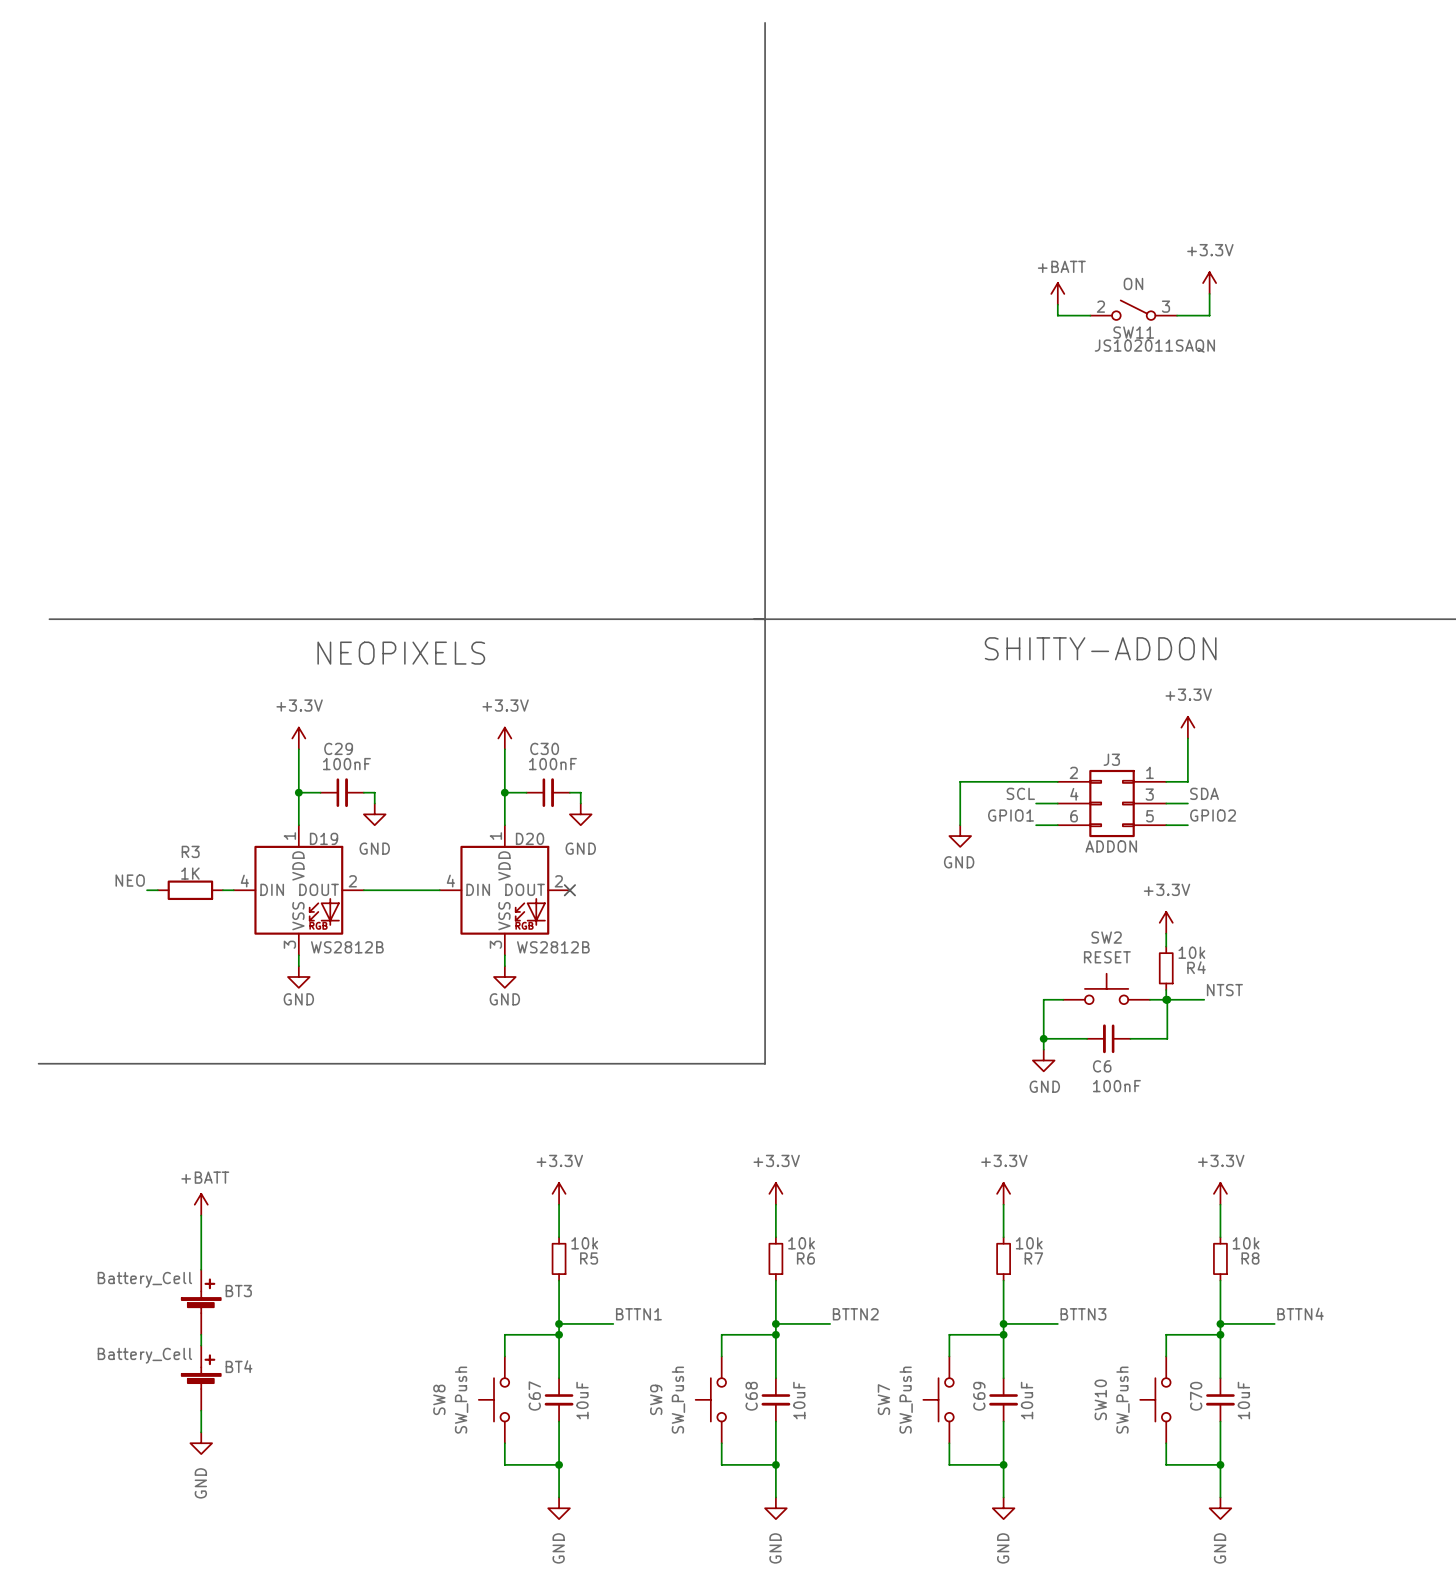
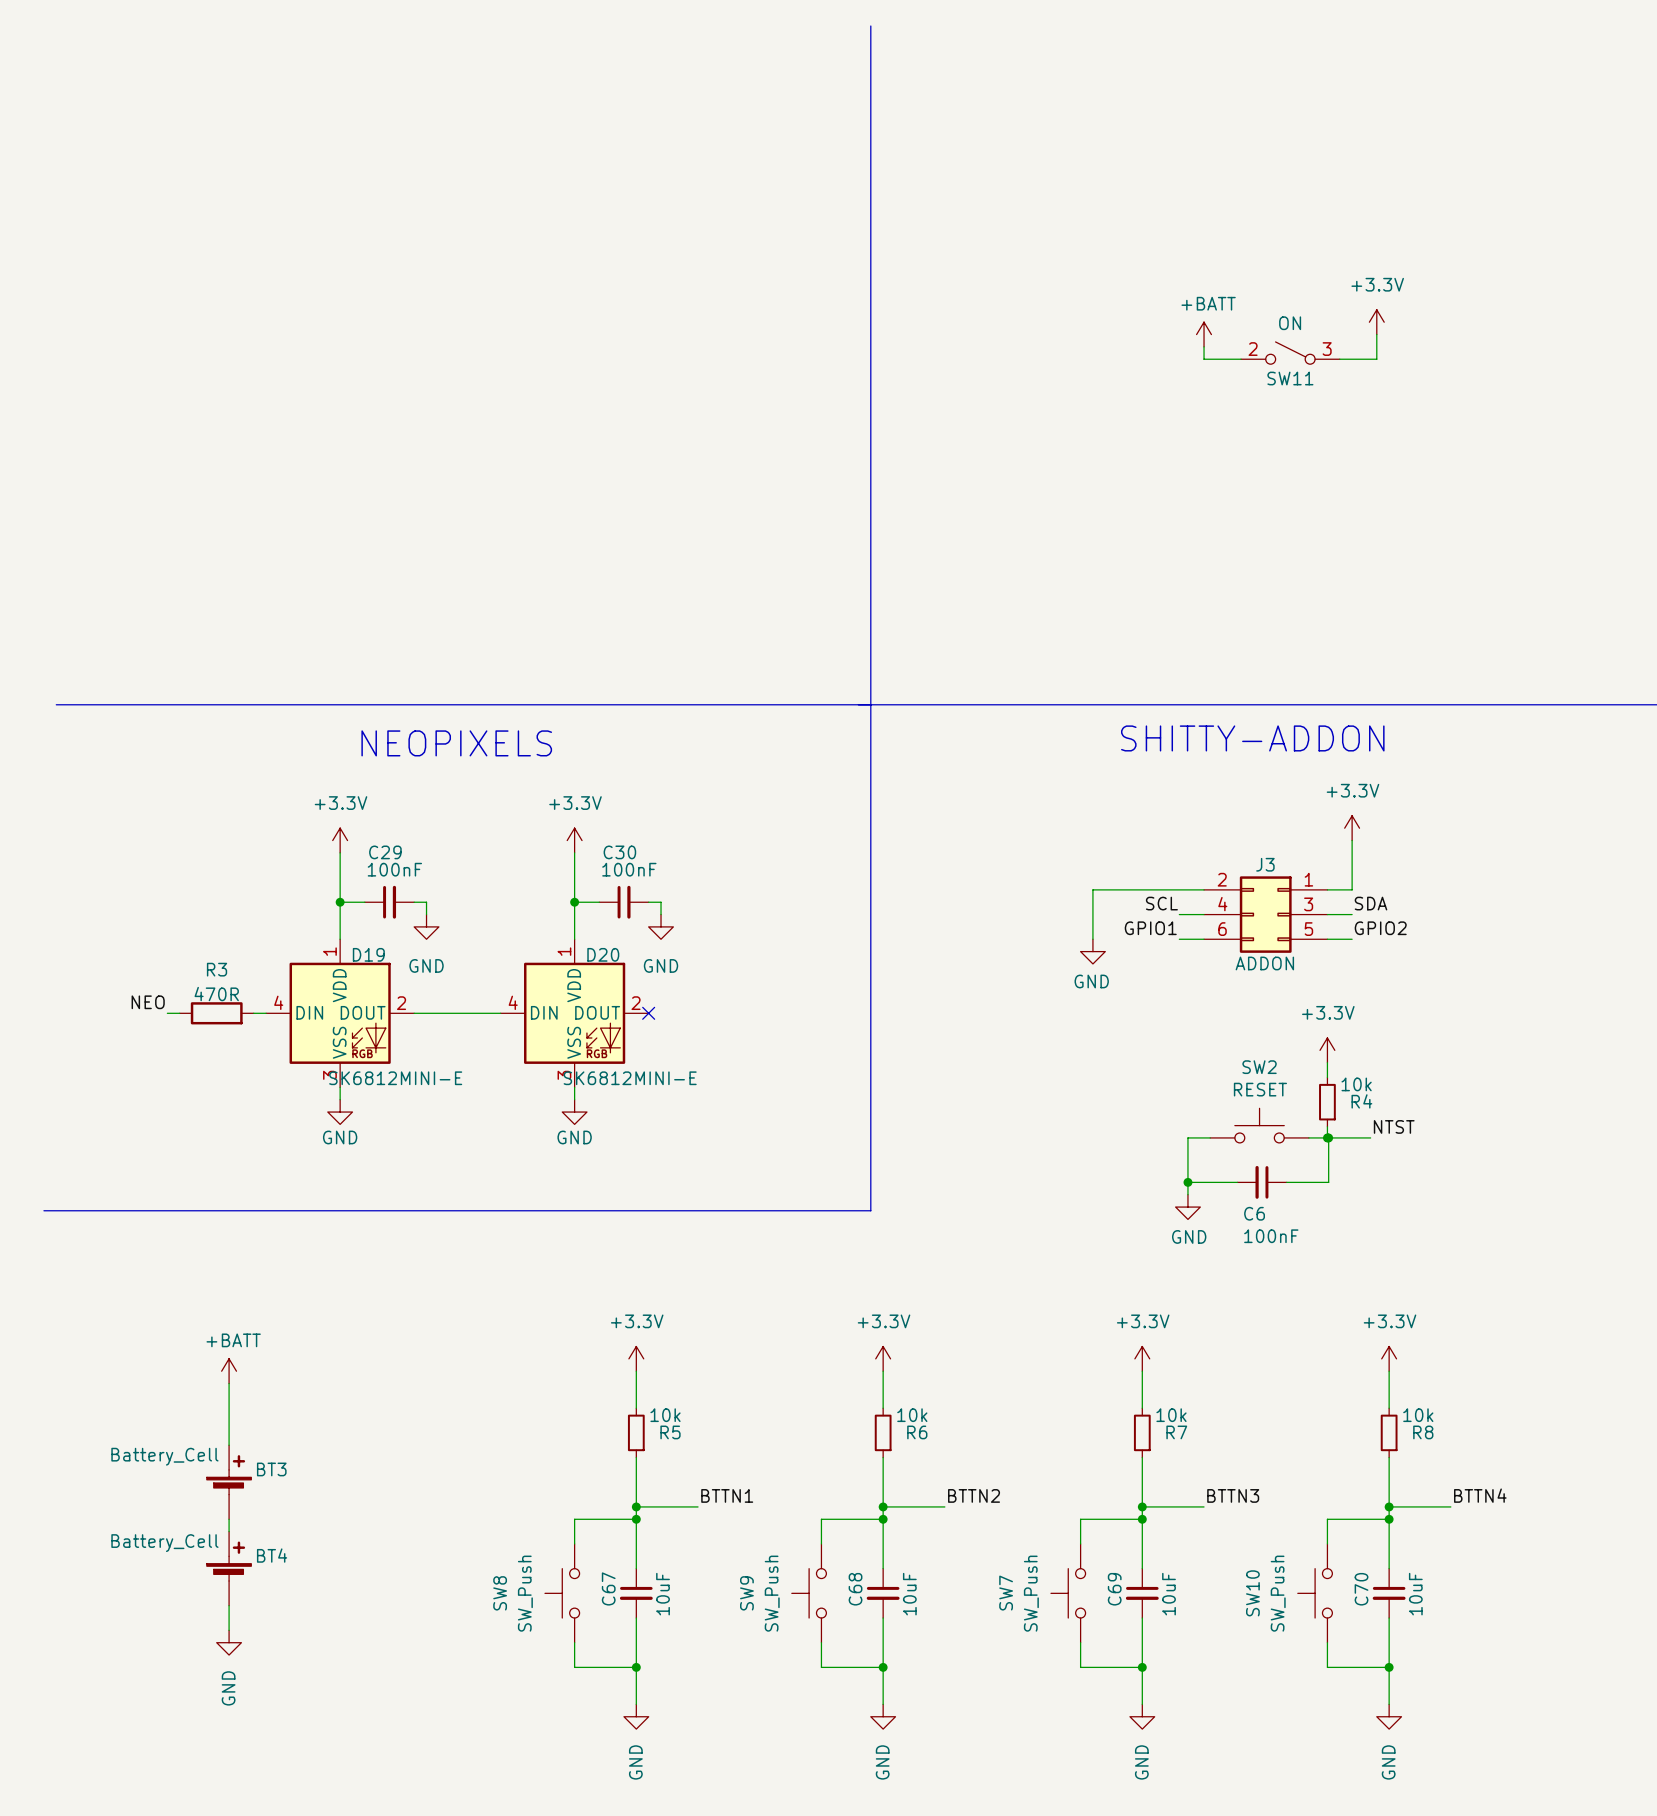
SW11 text: JS102011SAQN (1154, 346) -> none
R3 value: 1K (190, 873) -> 470R (216, 994)
D19 value: WS2812B (347, 947) -> SK6812MINI-E (395, 1078)
D20 value: WS2812B (553, 947) -> SK6812MINI-E (630, 1078)

